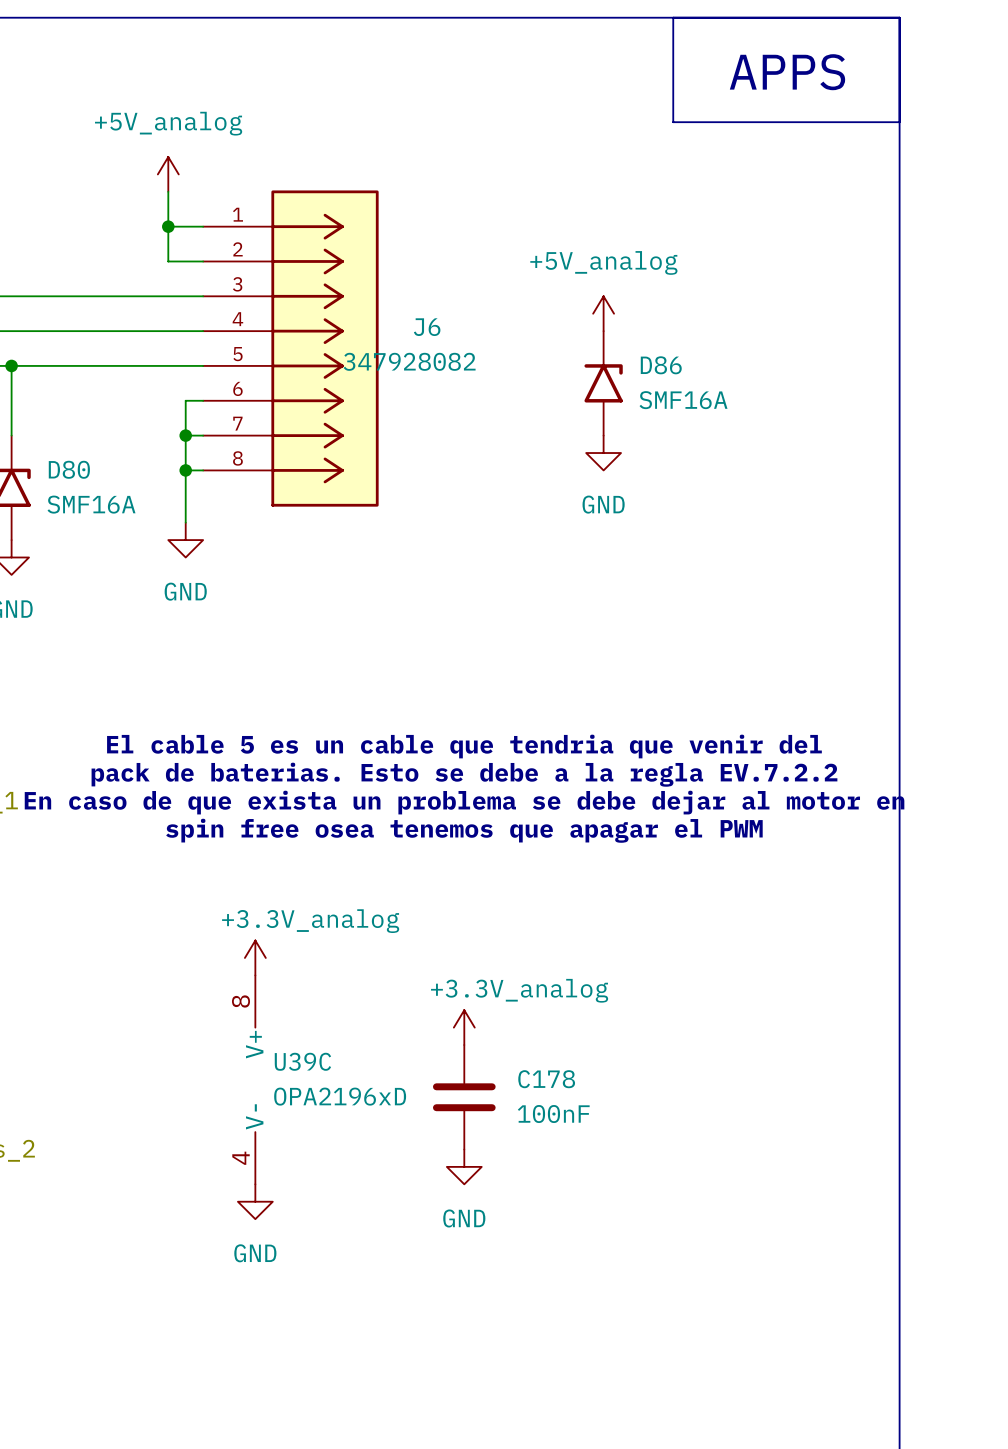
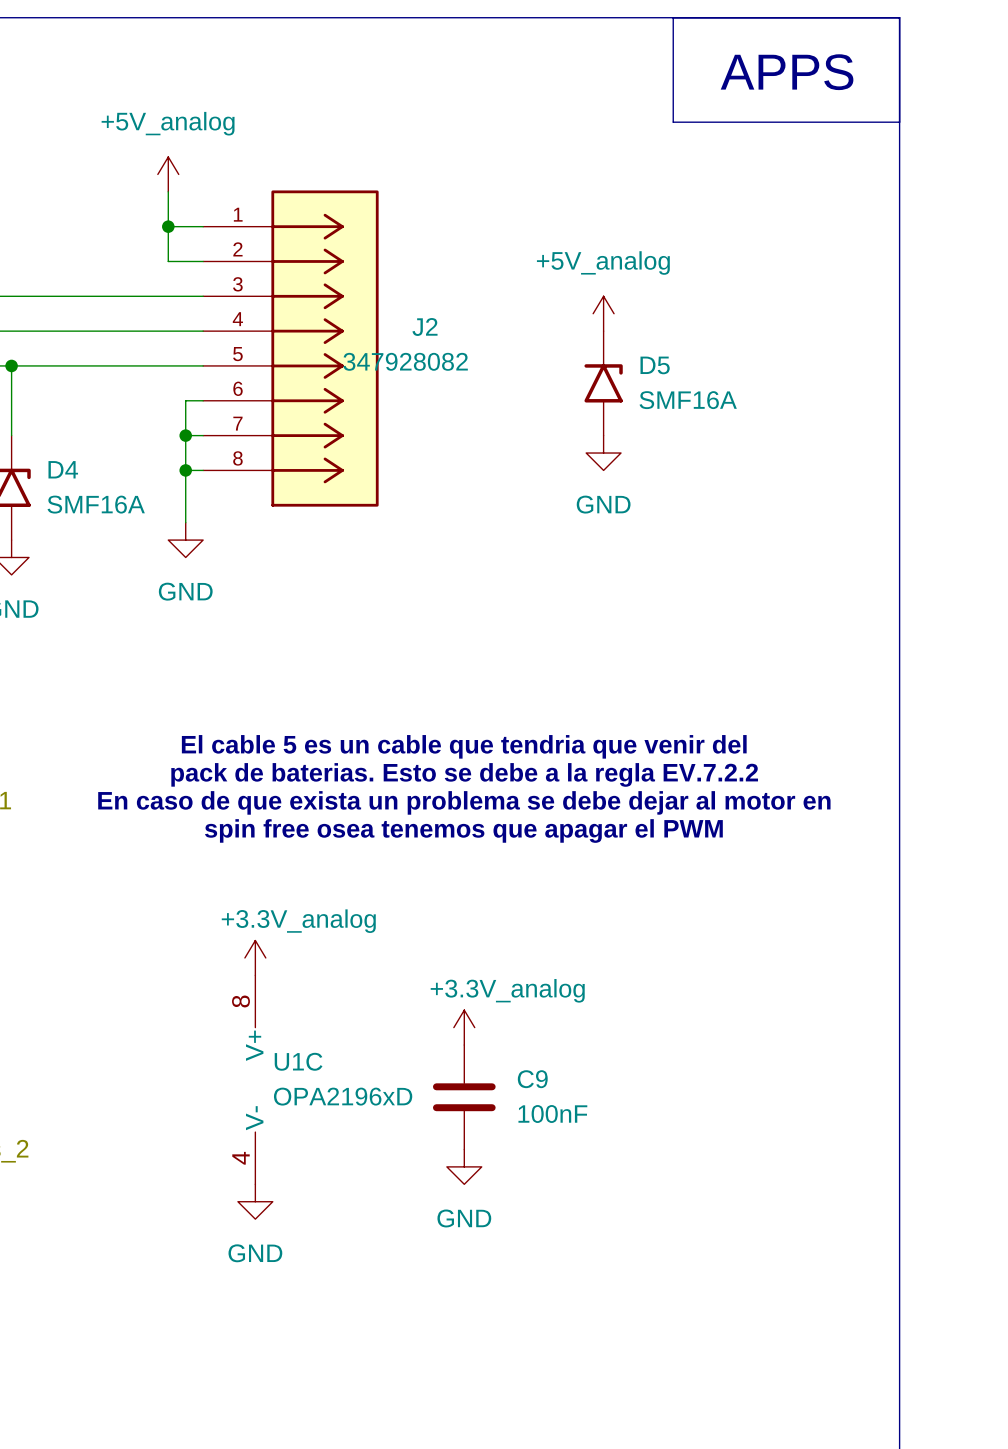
J6 name: J6 (427, 327) -> J2 (424, 326)
D86 name: D86 (661, 365) -> D5 (655, 365)
D80 name: D80 (69, 469) -> D4 (63, 469)
U39C name: U39C (302, 1061) -> U1C (298, 1061)
C178 name: C178 (546, 1079) -> C9 (532, 1079)

